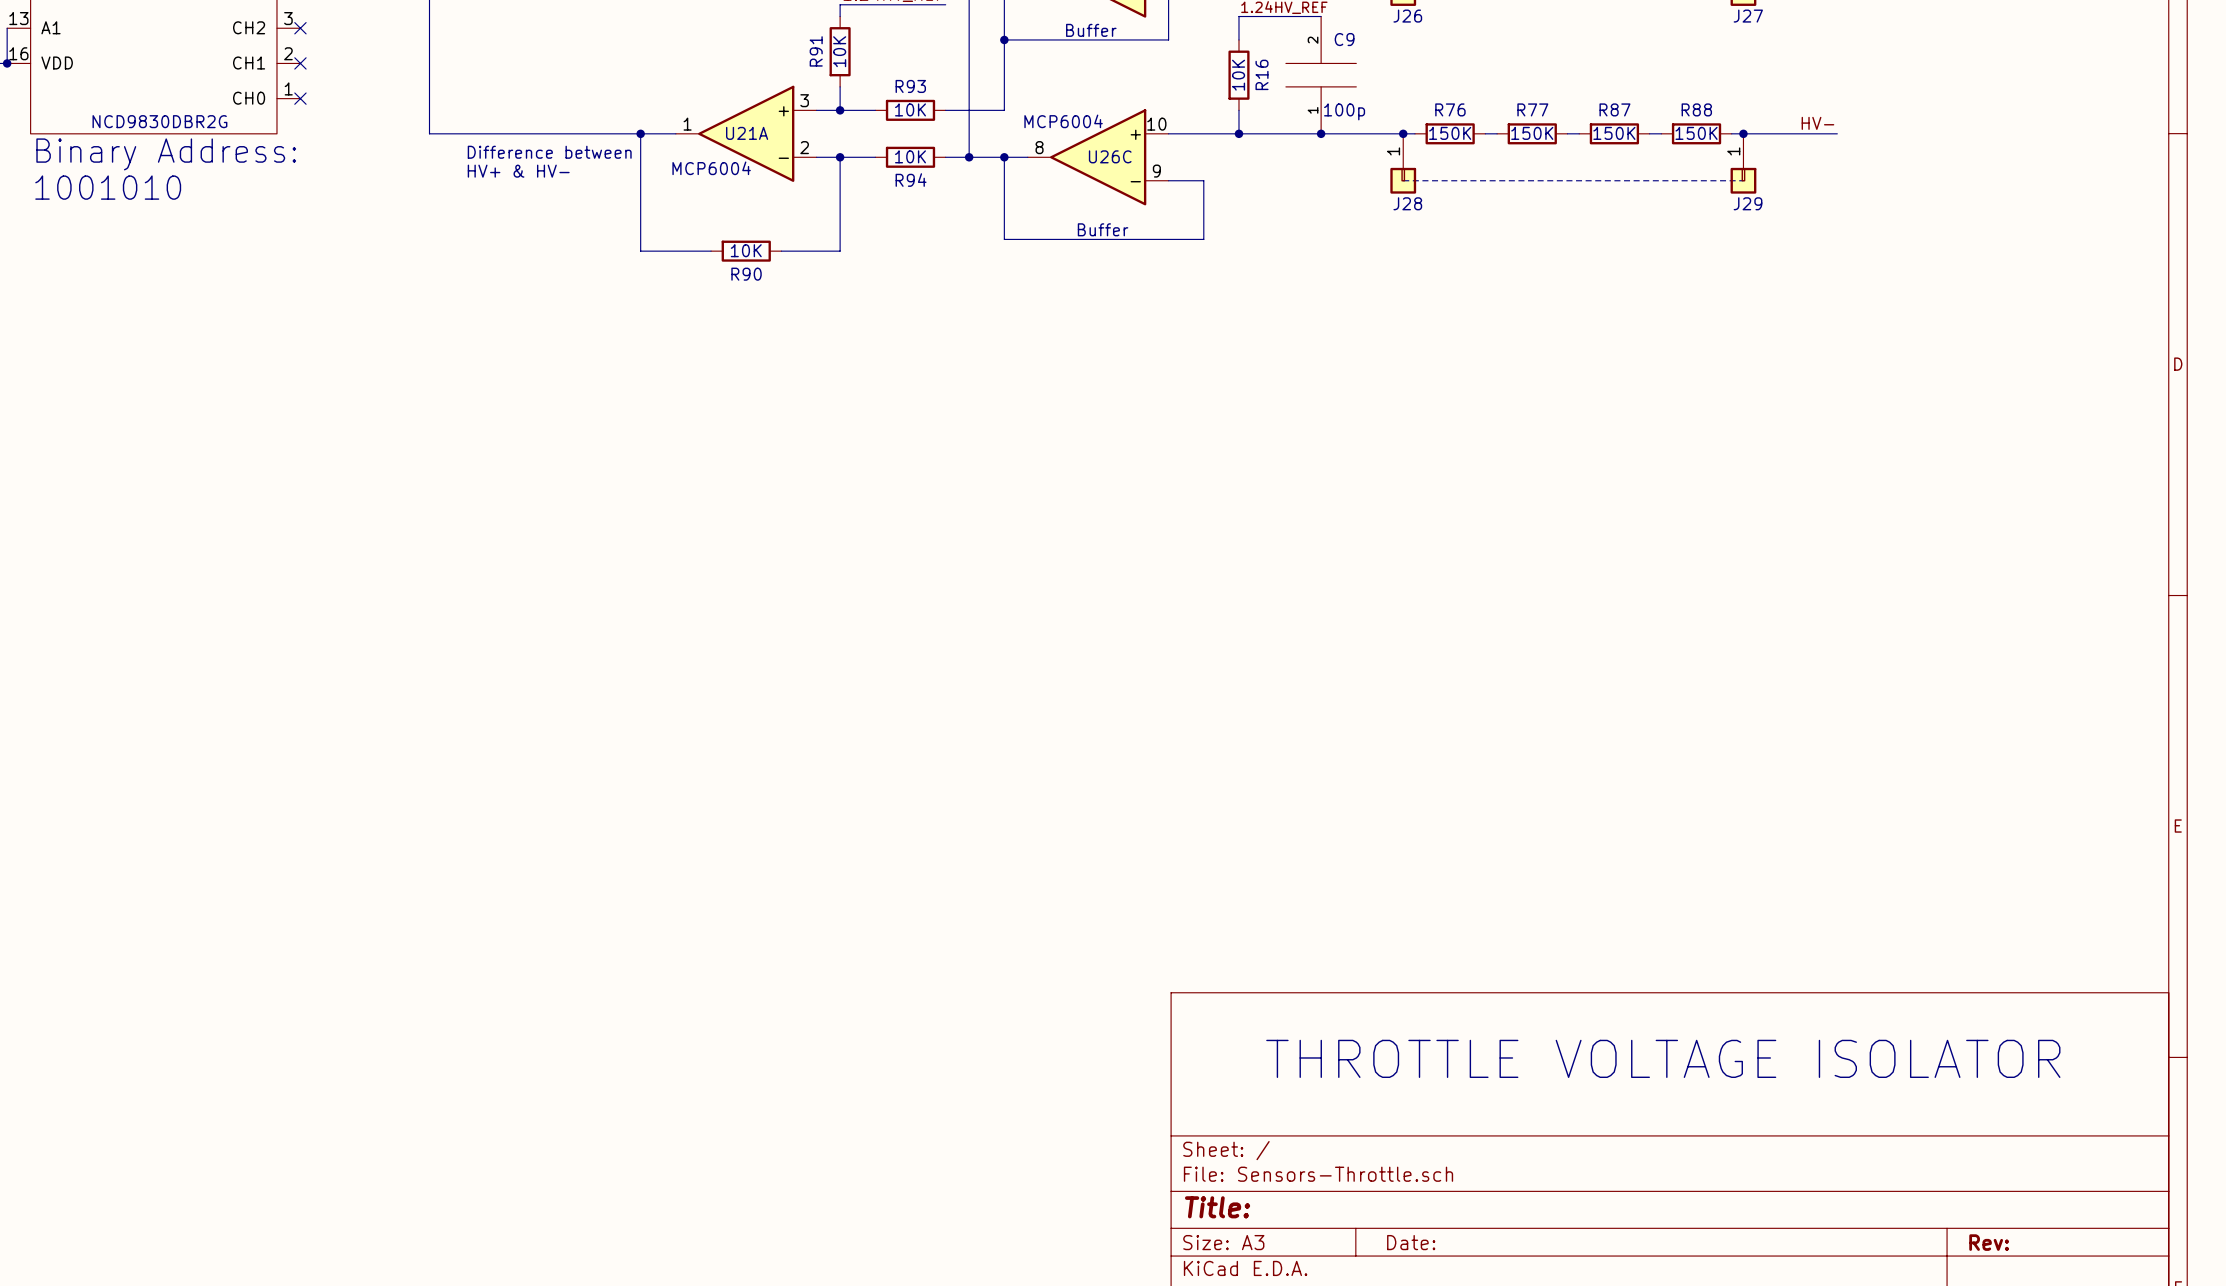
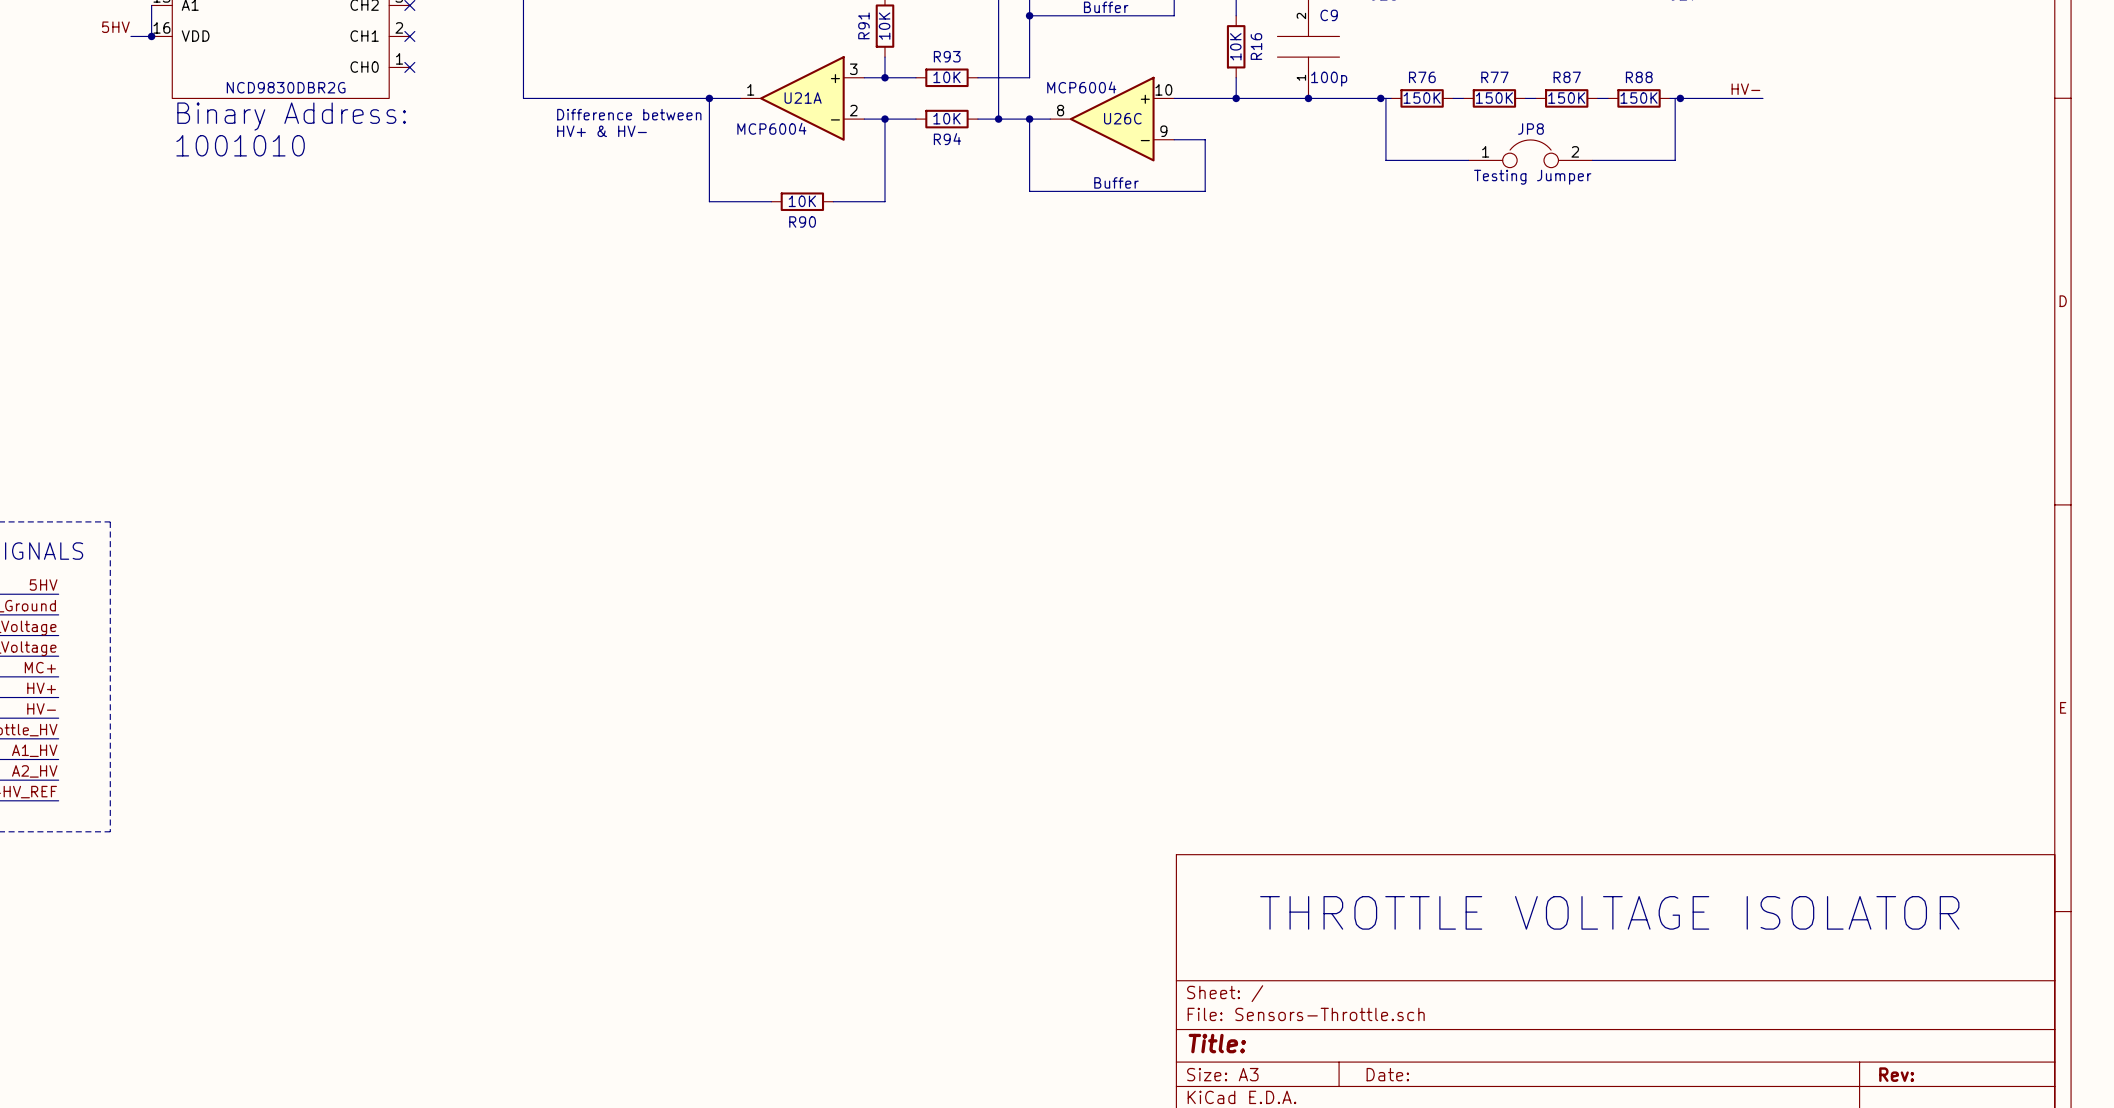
wire: none -> (1385, 98) (1385, 160) (1468, 160)
wire: none -> (1675, 98) (1675, 160) (1592, 160)
J28: (1403, 163) -> none
J29: (1743, 163) -> none
line: (1403, 180) (1743, 180) -> none
JP8: none -> Testing Jumper (1530, 153)

